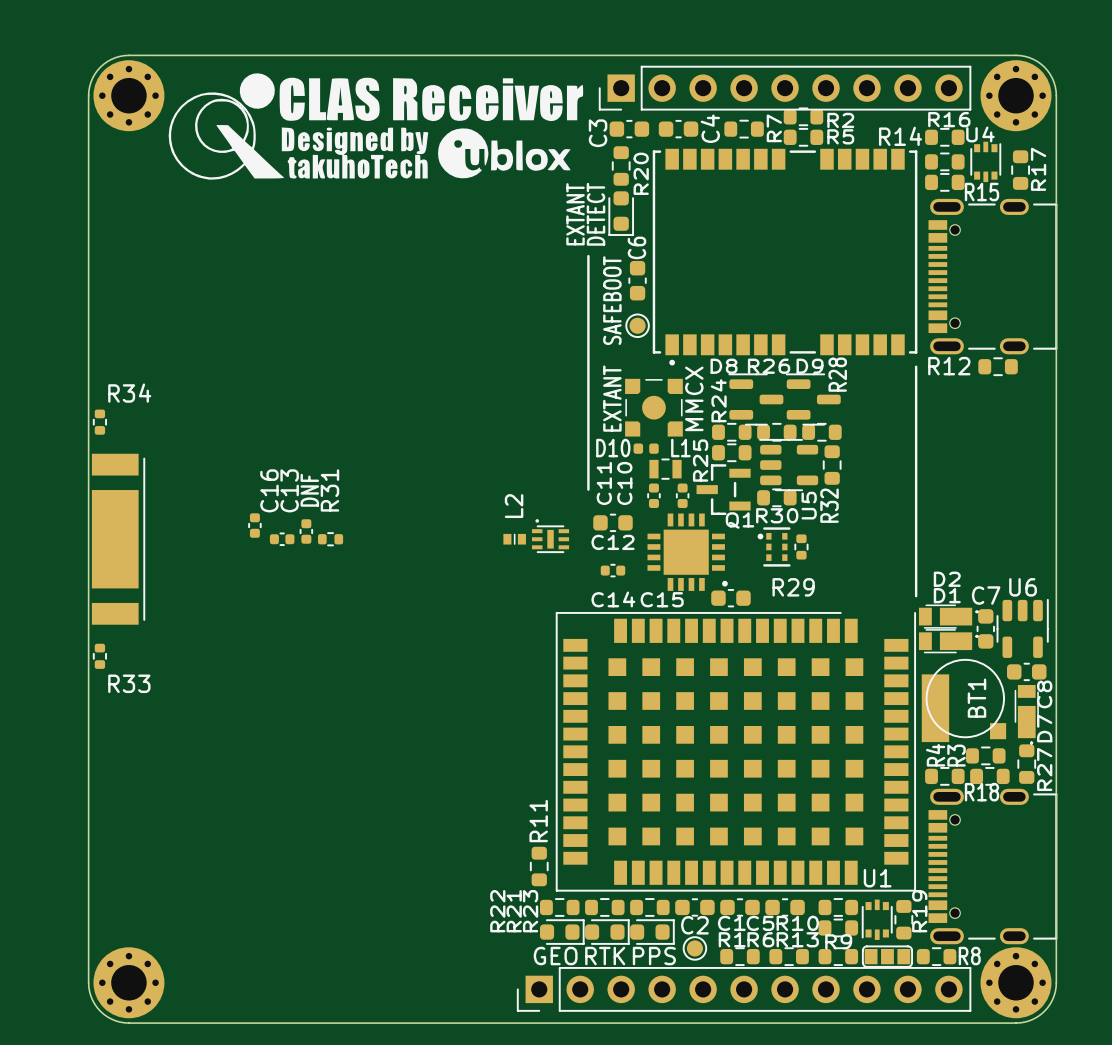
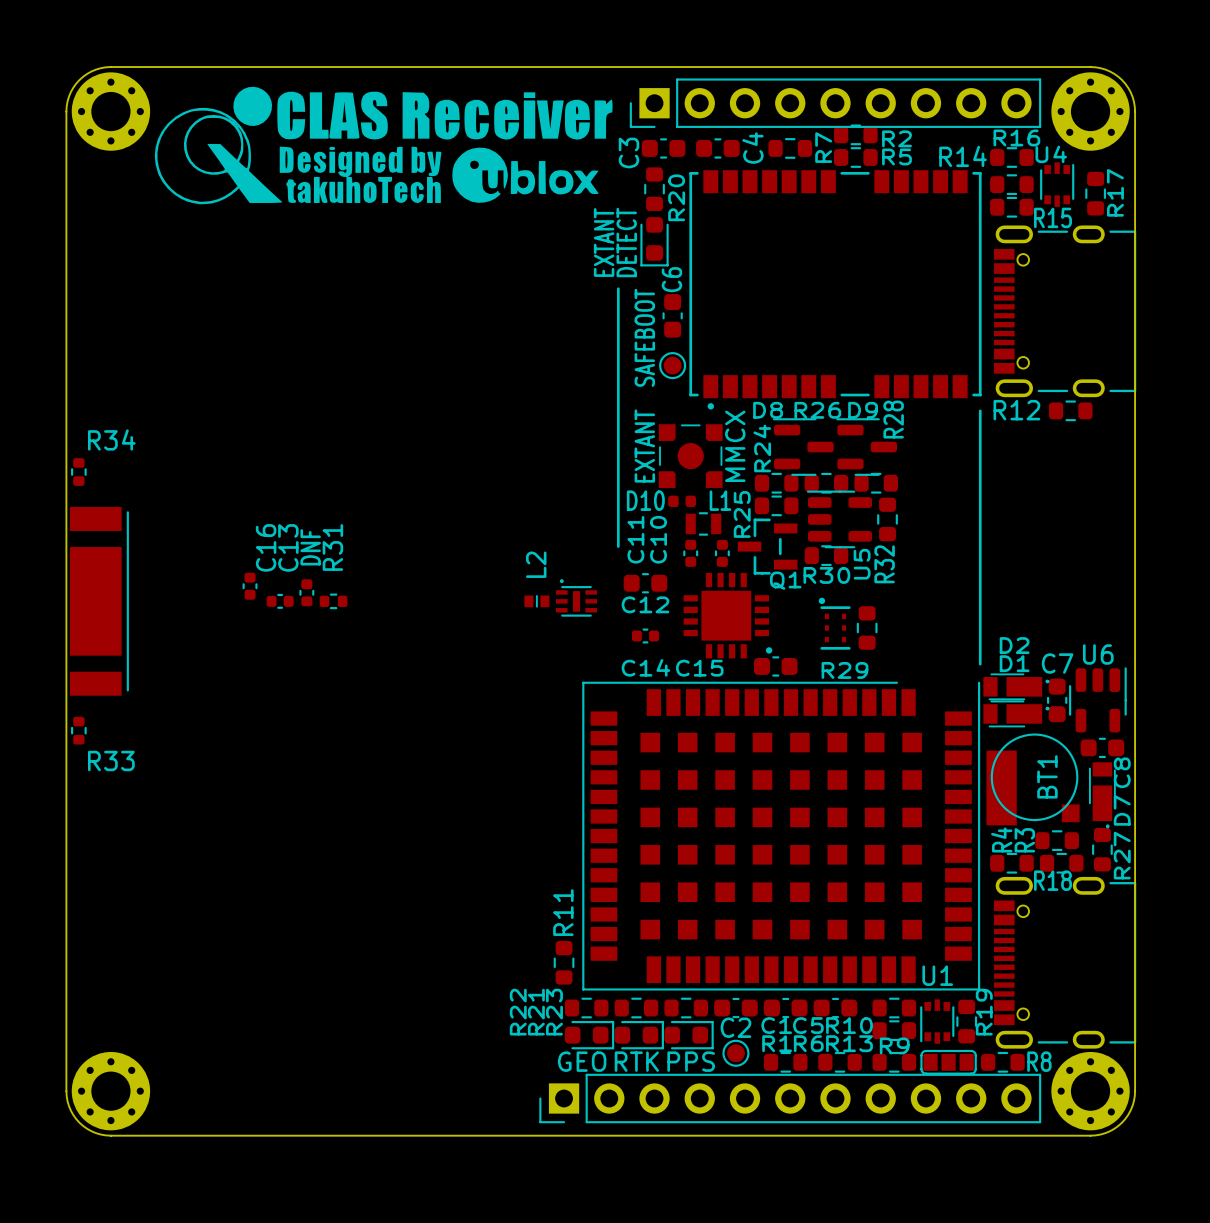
R29 footprint: [794, 534, 809, 560] -> [856, 606, 878, 650]
part: (774, 546) -> none
part: none -> (834, 623)

